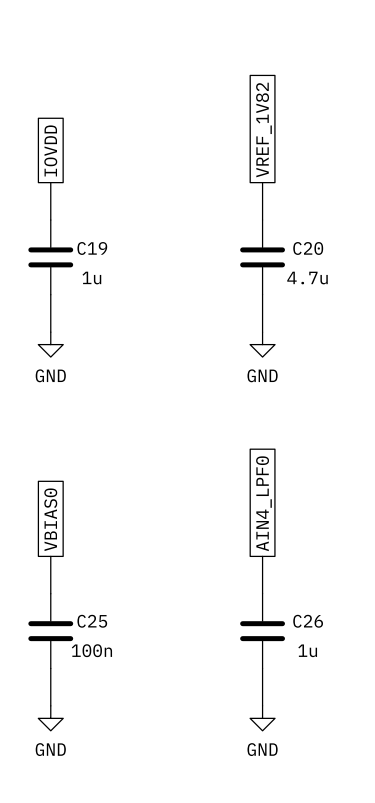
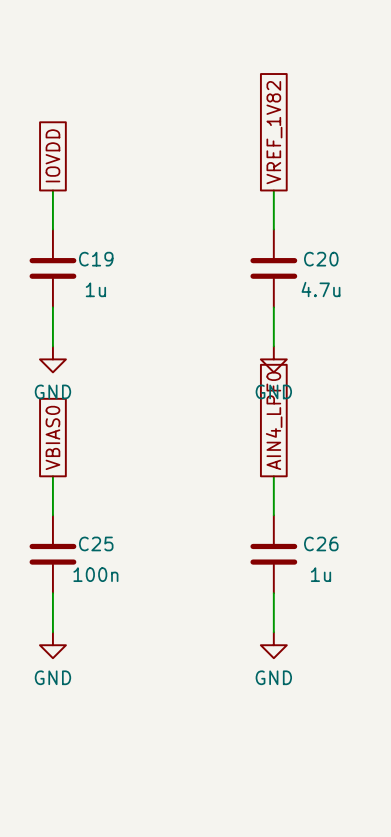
global label position: AIN4_LPF0 (263, 503) -> AIN4_LPF0 (274, 420)
global label position: VBIAS0 (50, 519) -> VBIAS0 (52, 437)
C25 position: (50, 631) -> (52, 554)
C26 position: (262, 631) -> (273, 554)
wire: (50, 668) (50, 705) -> (52, 476) (52, 515)
wire: (262, 668) (262, 705) -> (273, 476) (273, 515)
power symbol position: GND (50, 718) -> GND (52, 645)
power symbol position: GND (262, 718) -> GND (273, 645)

